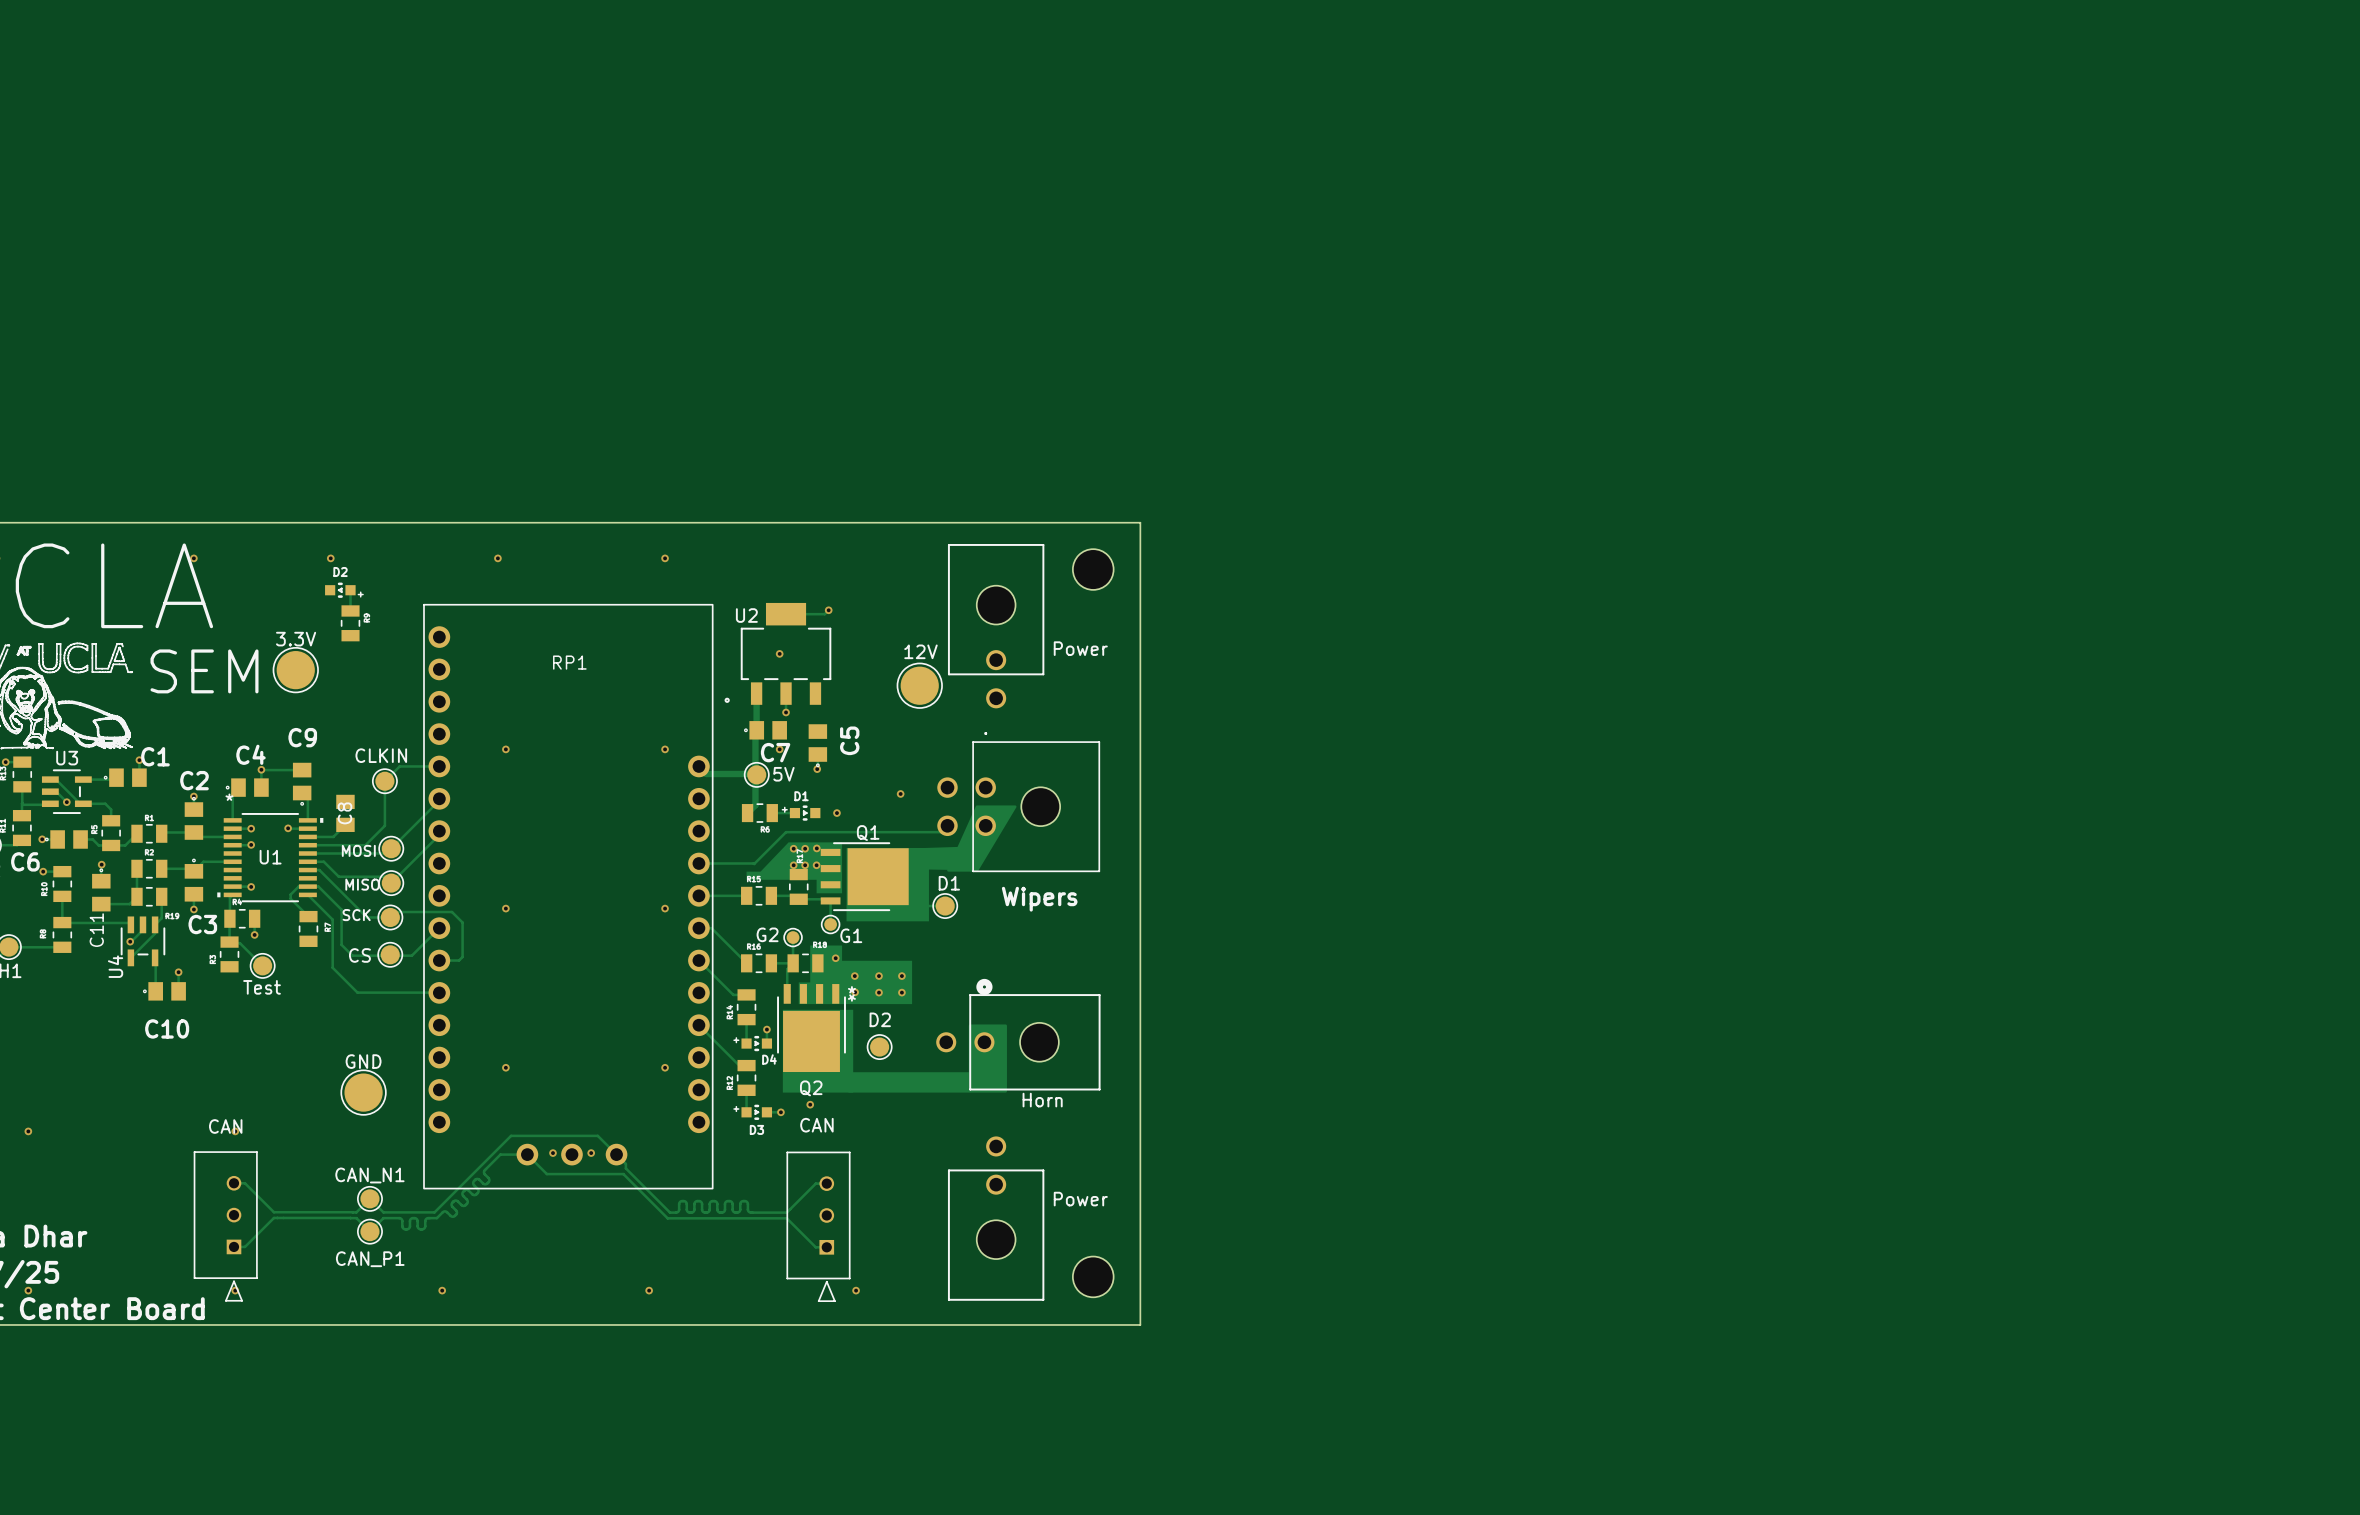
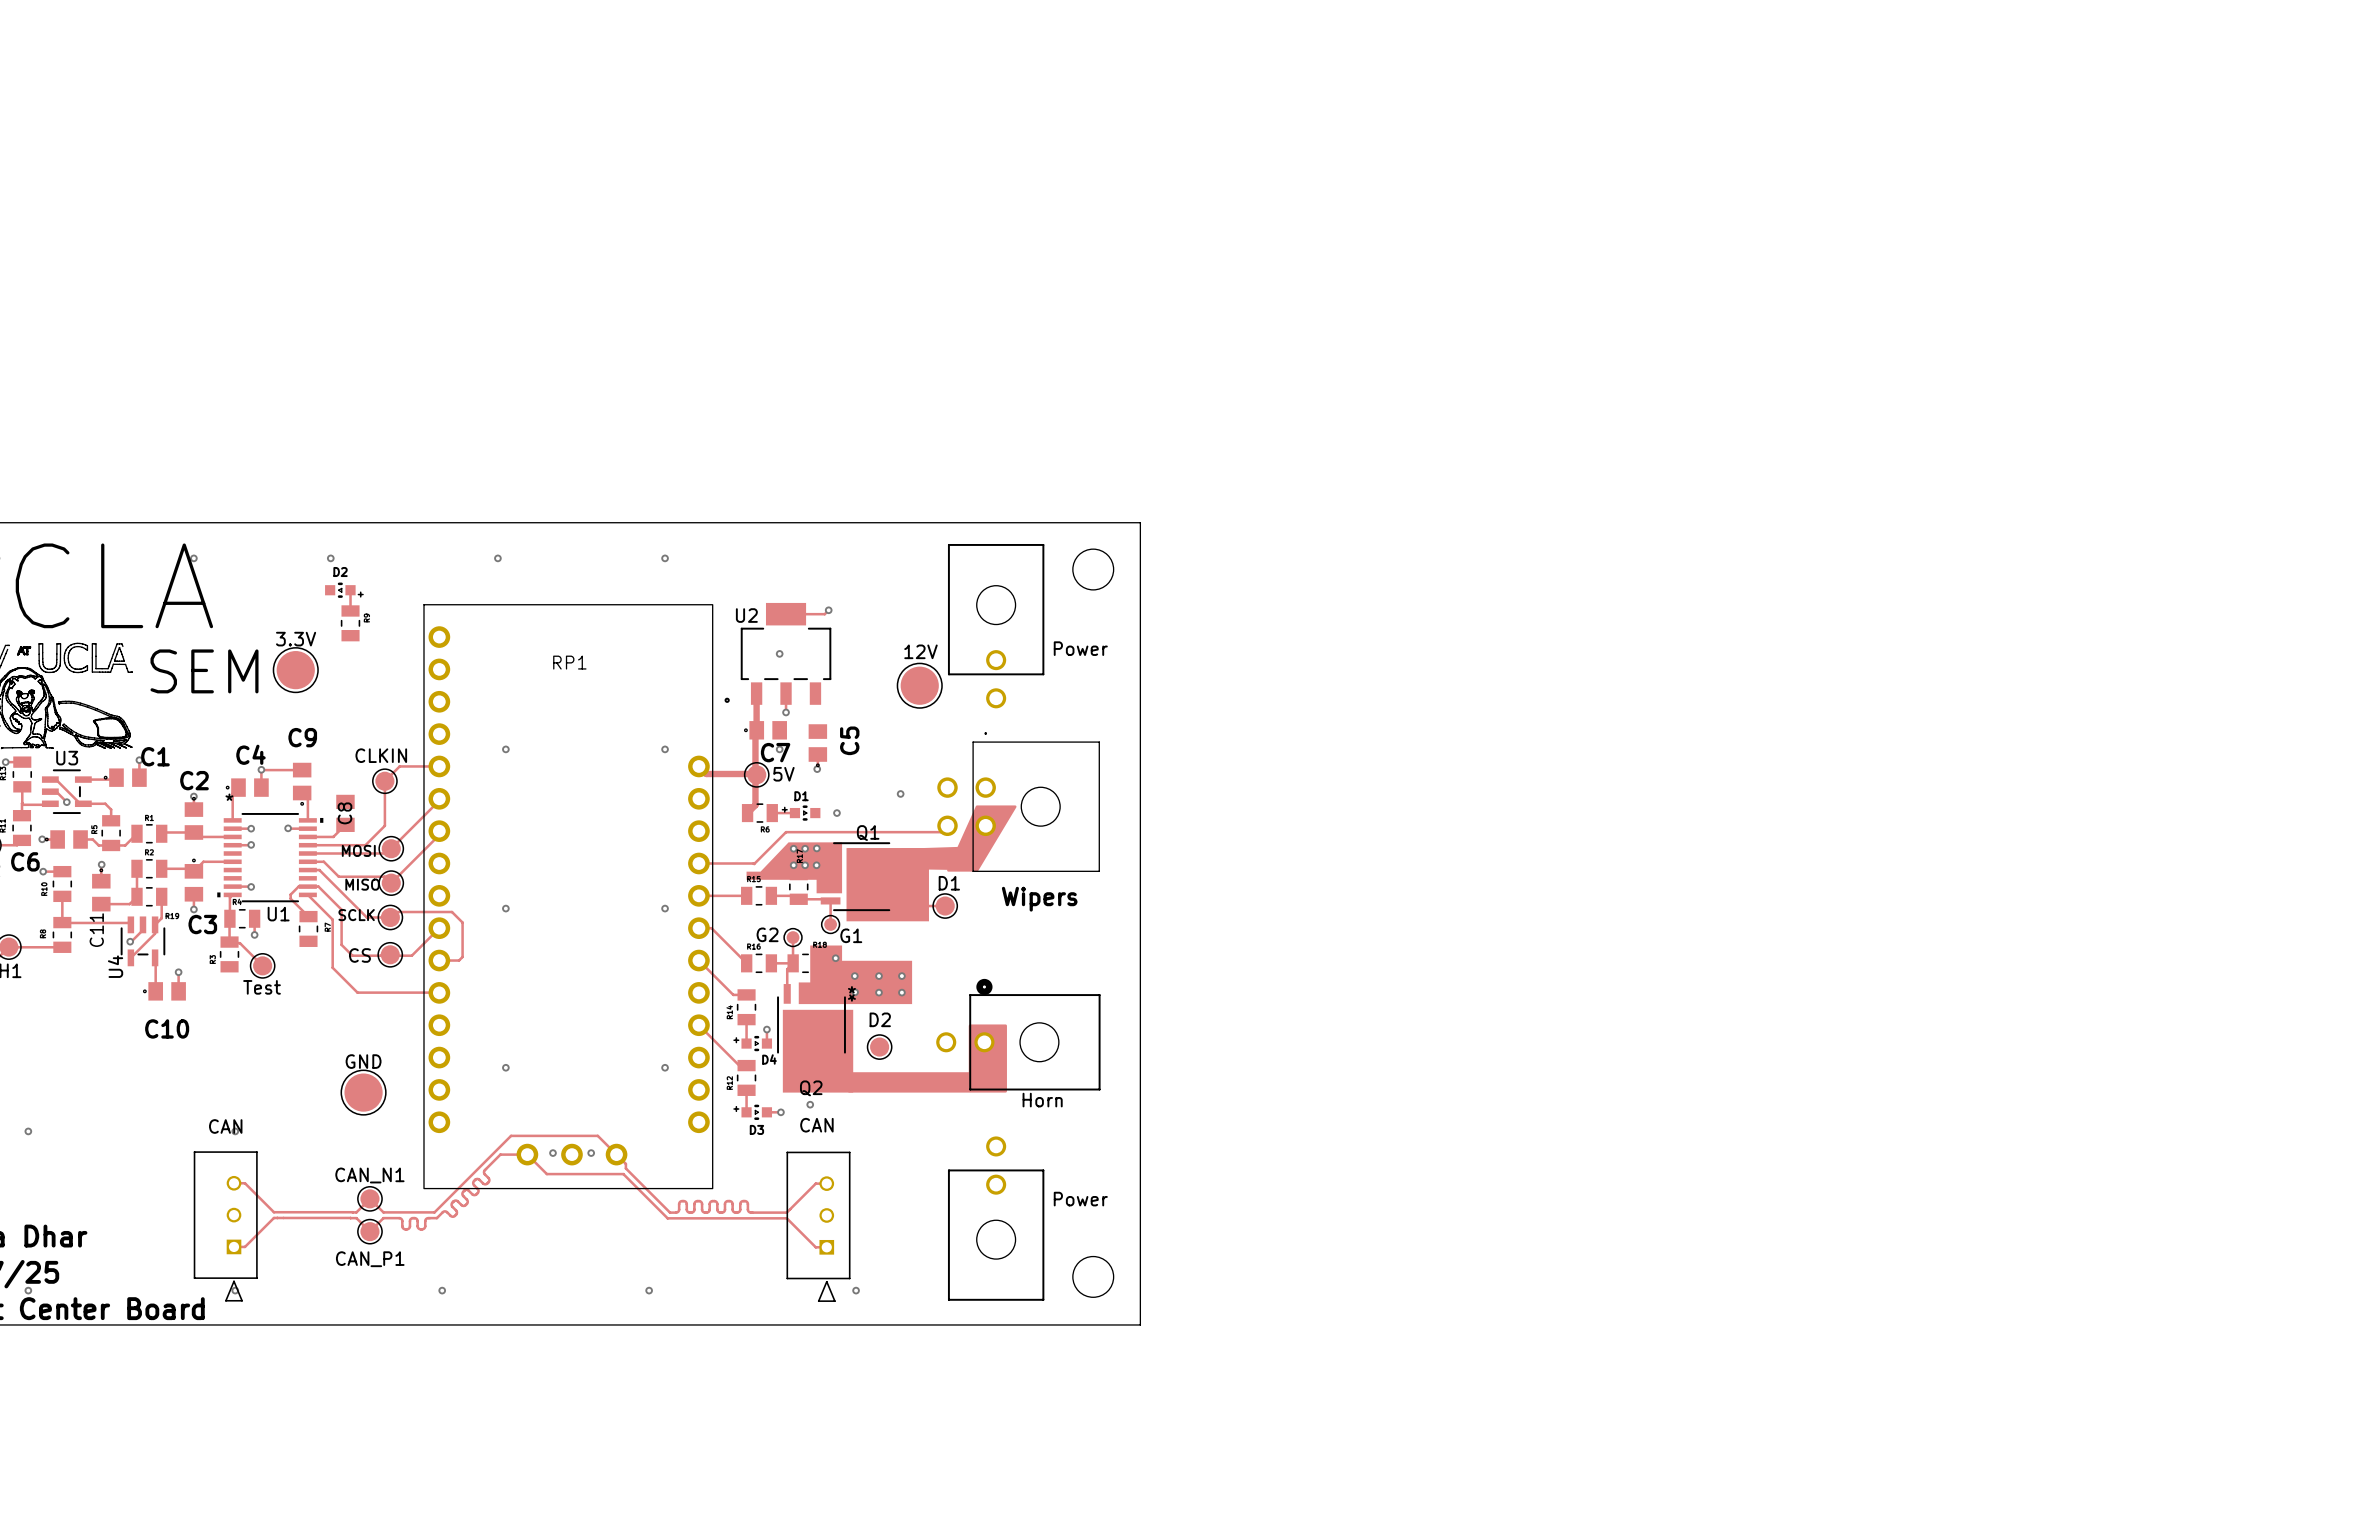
U1 name position: U1 (270, 857) -> U1 (278, 914)
SCK name: SCK (356, 915) -> SCLK (356, 915)

